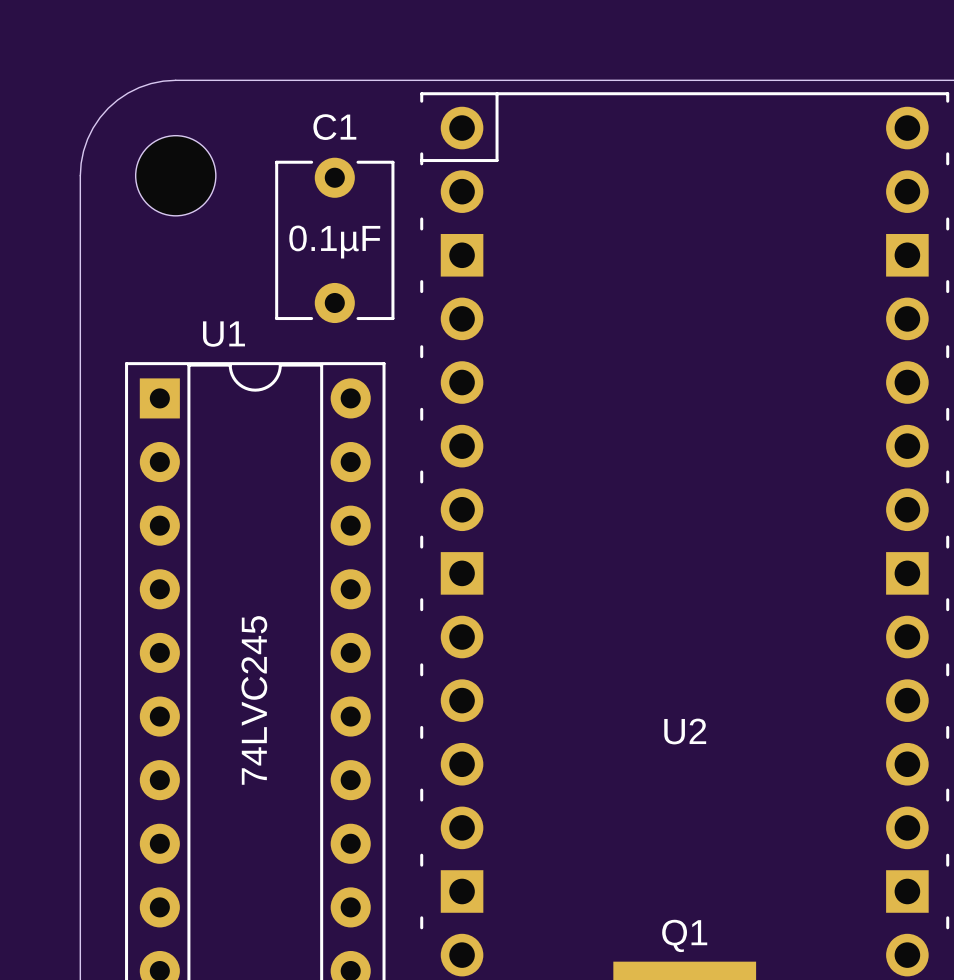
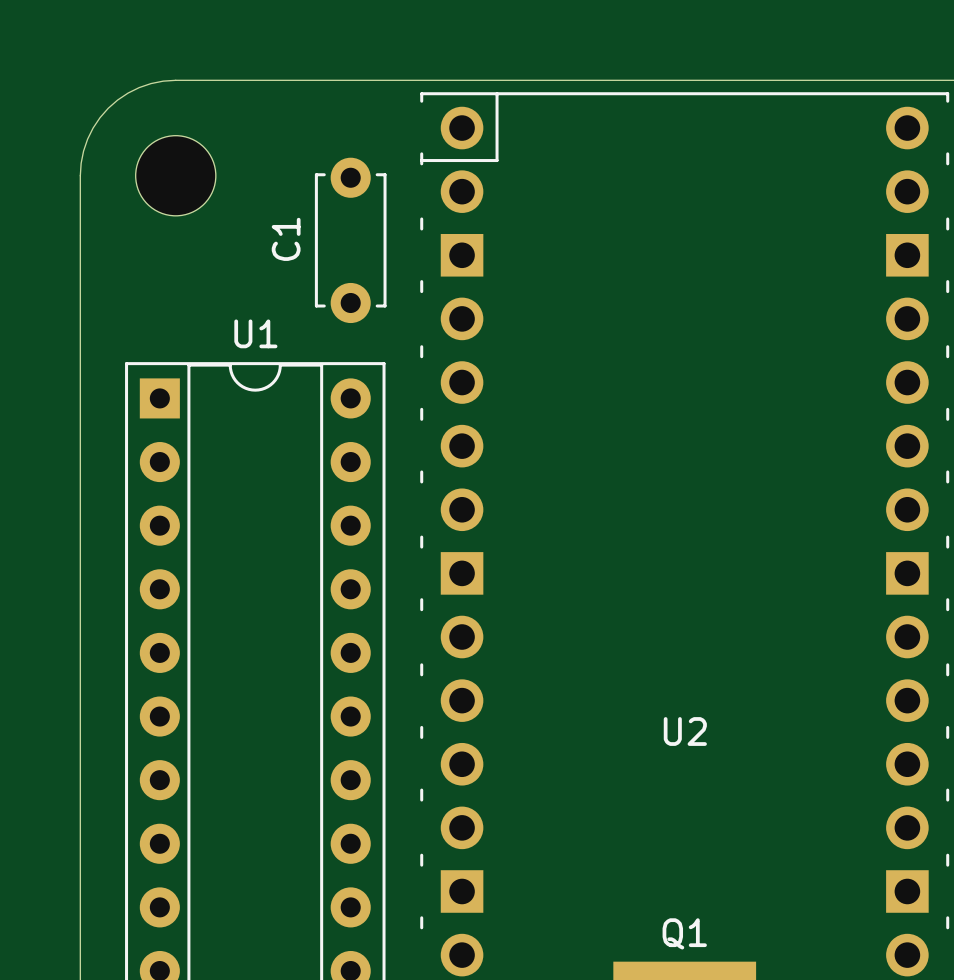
C1 name position: C1 (334, 127) -> C1 (286, 239)
C1 footprint: [275, 157, 395, 324] -> [314, 157, 387, 324]
C1 value: 0.1µF (334, 242) -> none
U1 name position: U1 (223, 334) -> U1 (255, 333)
U1 value: 74LVC245 (254, 700) -> none

